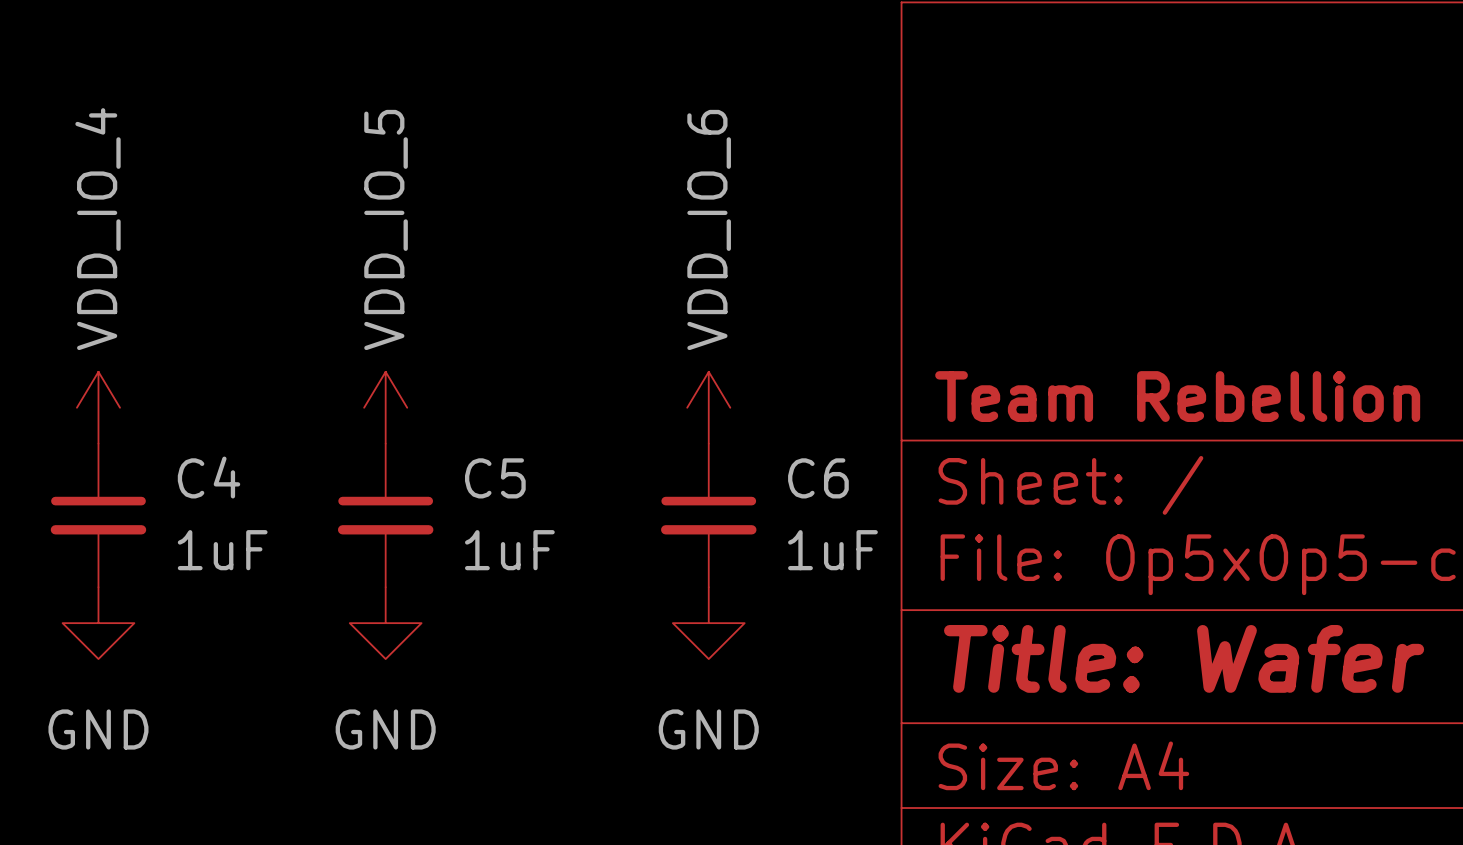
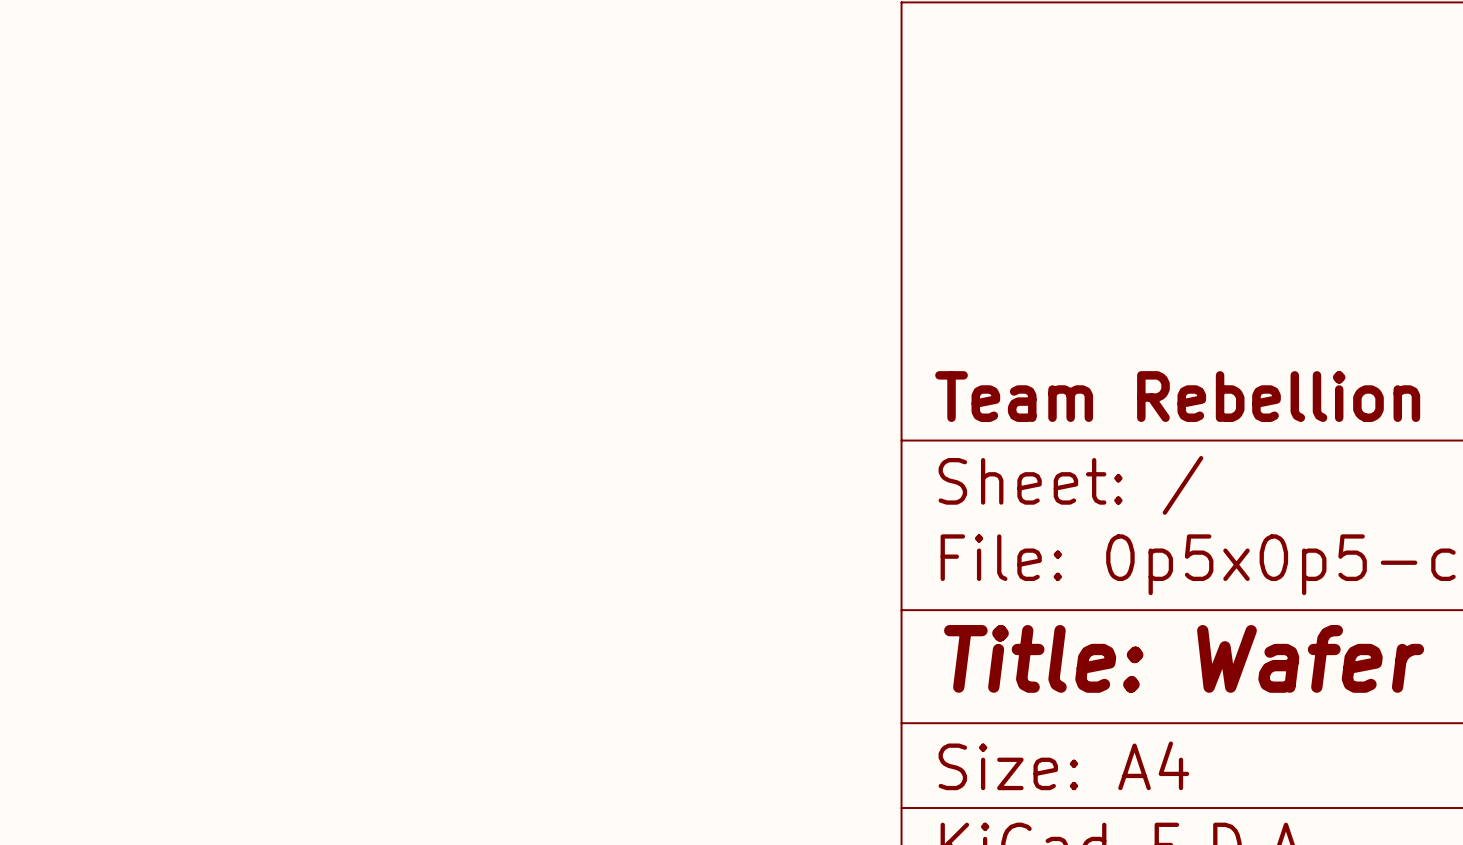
power symbol: VDD_IO_4 (98, 407) -> none
power symbol: VDD_IO_5 (385, 407) -> none
power symbol: VDD_IO_6 (708, 407) -> none
C4: 1uF (98, 515) -> none
C5: 1uF (385, 515) -> none
C6: 1uF (708, 515) -> none
power symbol: GND (98, 623) -> none
power symbol: GND (385, 623) -> none
power symbol: GND (708, 623) -> none

